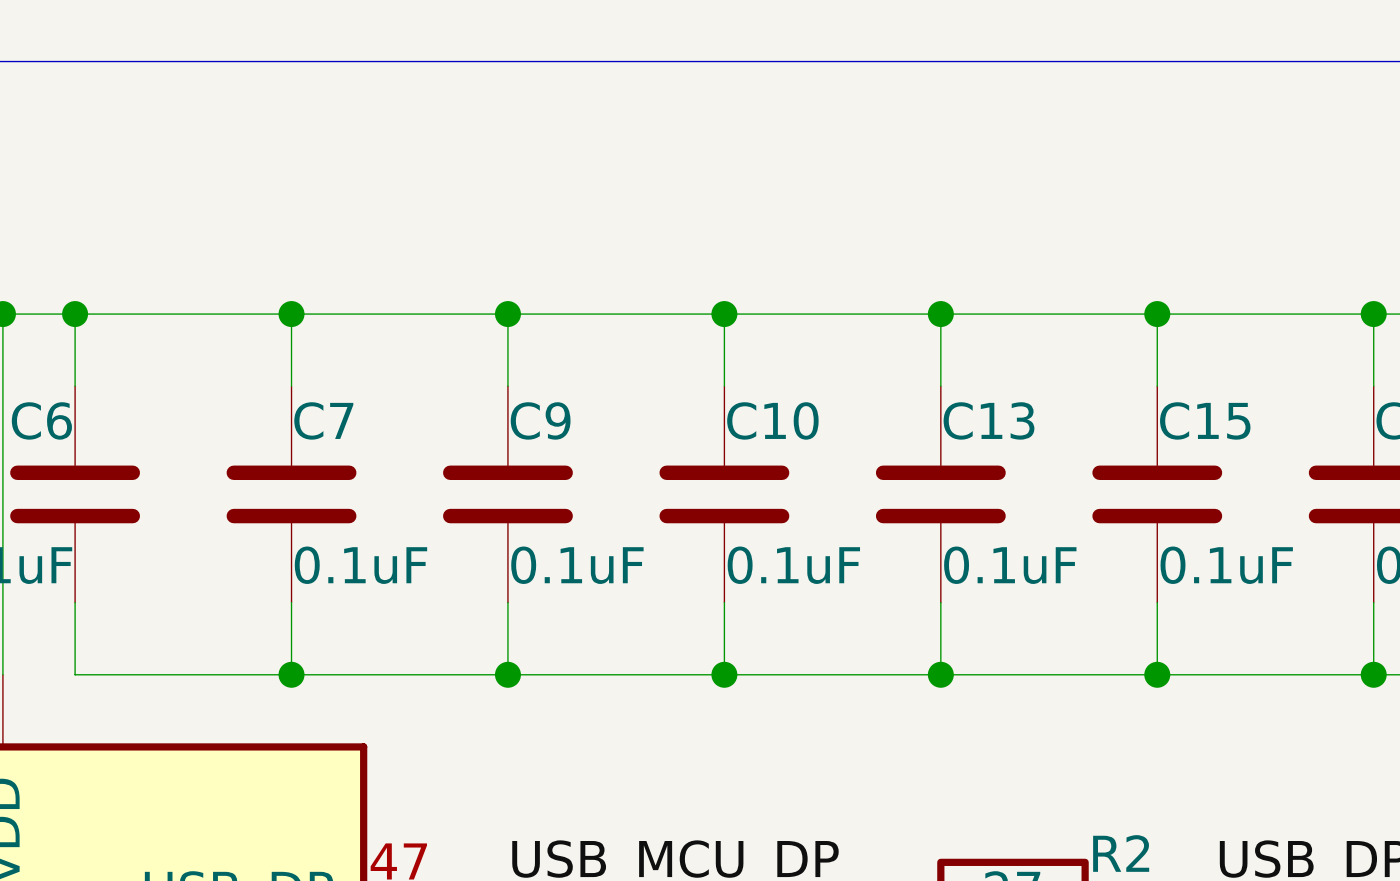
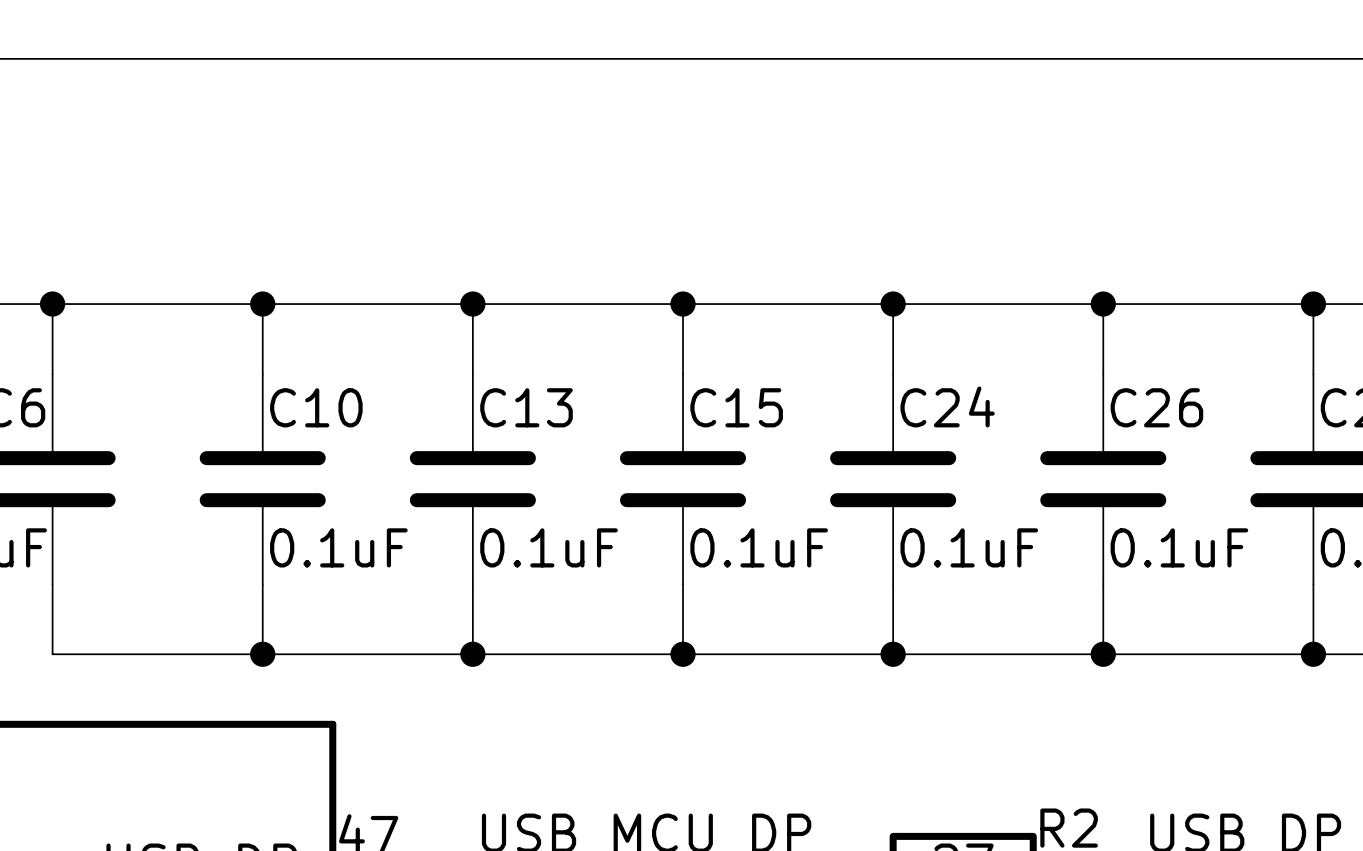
C7 name: C7 (323, 420) -> C10 (316, 407)
C9 name: C9 (540, 420) -> C13 (526, 407)
C10 name: C10 (772, 420) -> C15 (736, 407)
C13 name: C13 (988, 420) -> C24 (947, 406)
C15 name: C15 (1205, 420) -> C26 (1156, 407)

